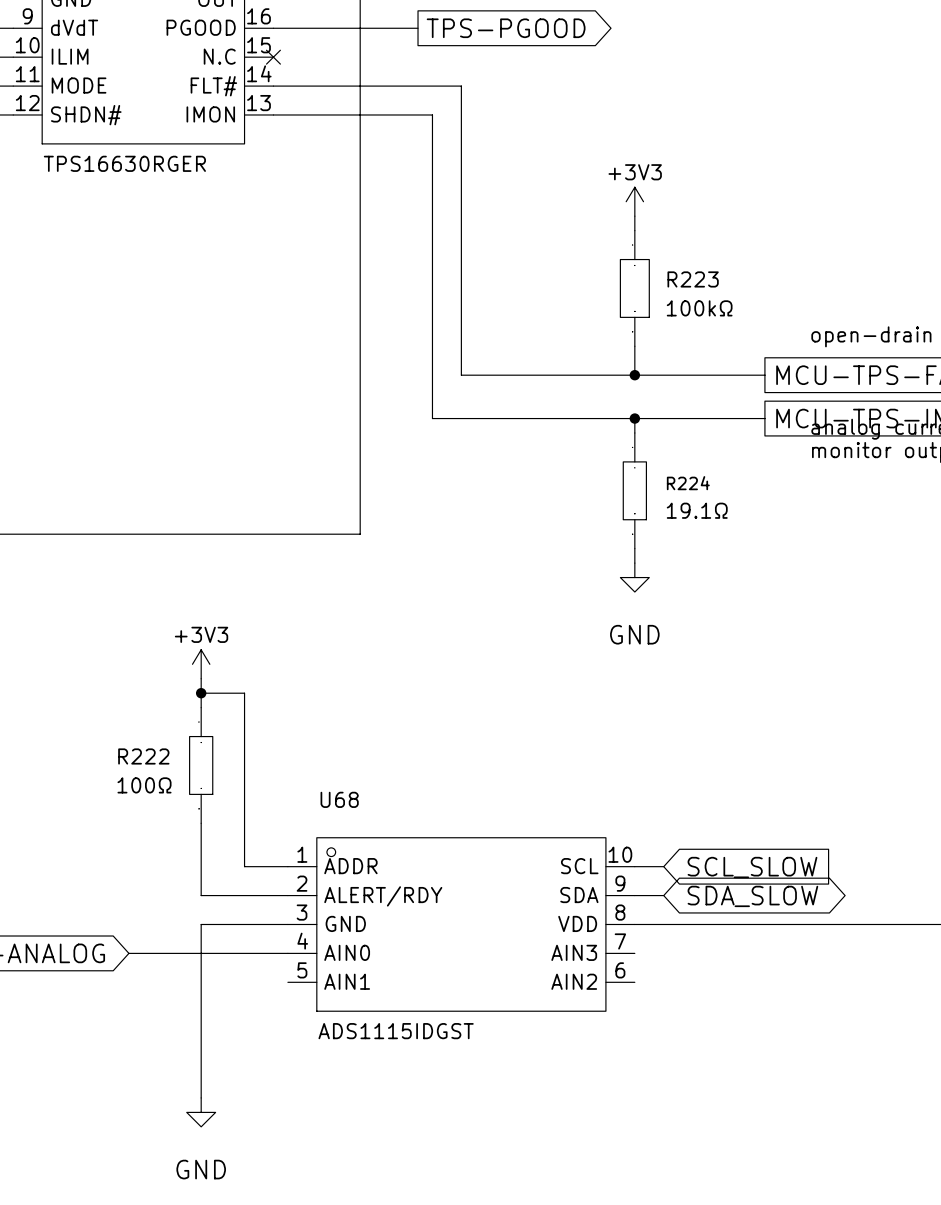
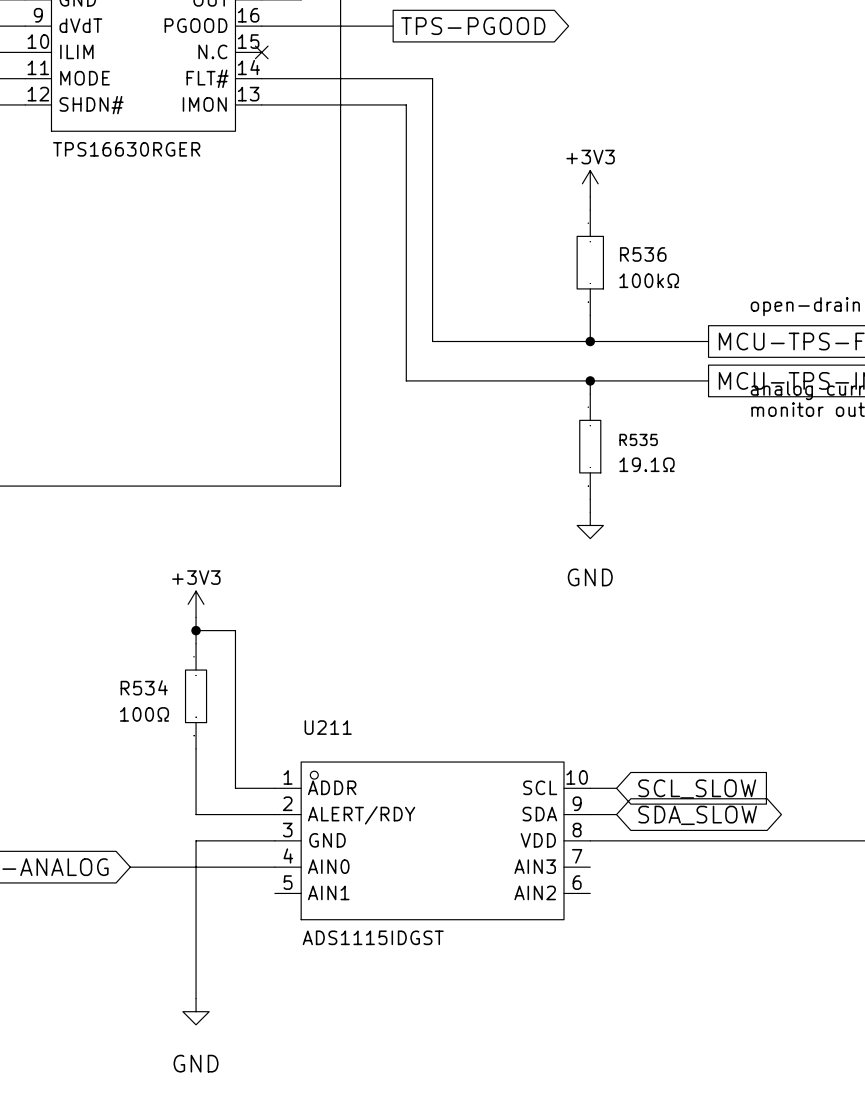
R223 name: R223 (693, 279) -> R536 (643, 254)
R224 name: R224 (688, 483) -> R535 (638, 439)
R222 name: R222 (143, 756) -> R534 (144, 687)
U68 name: U68 (339, 799) -> U211 (328, 727)

